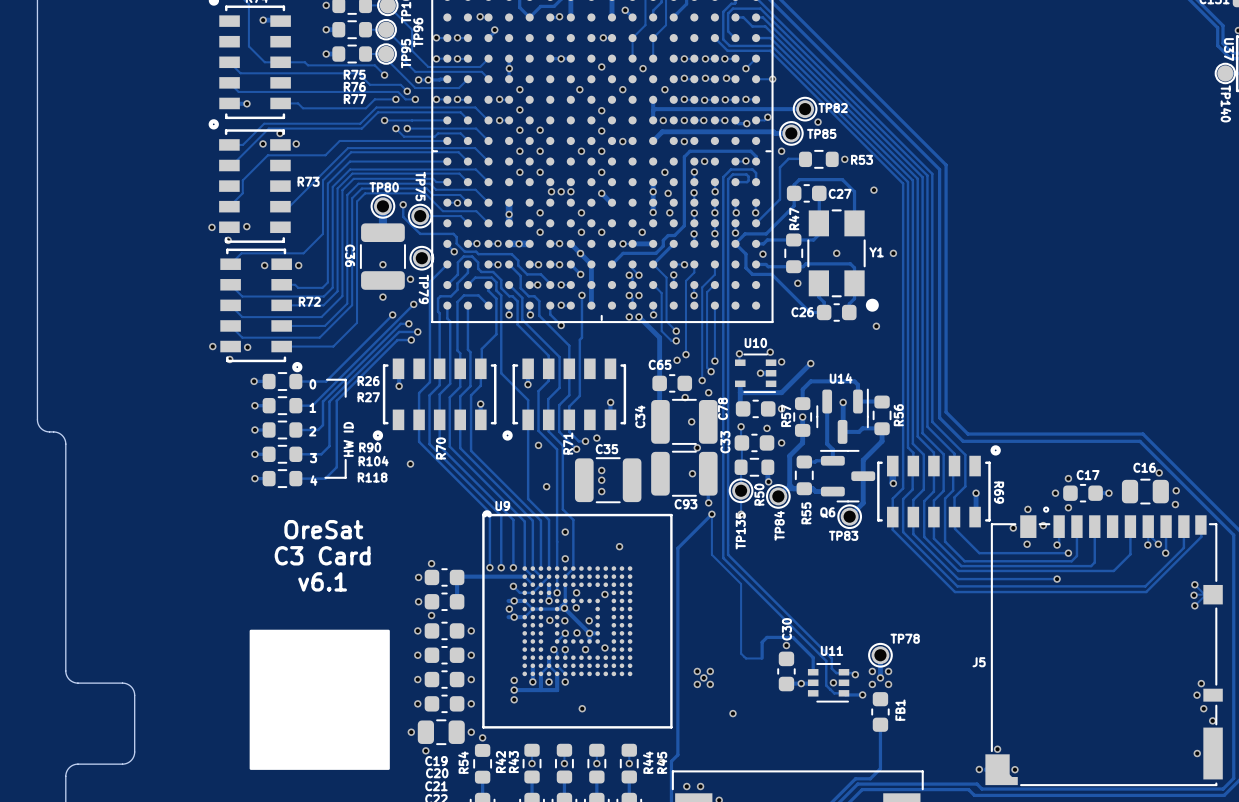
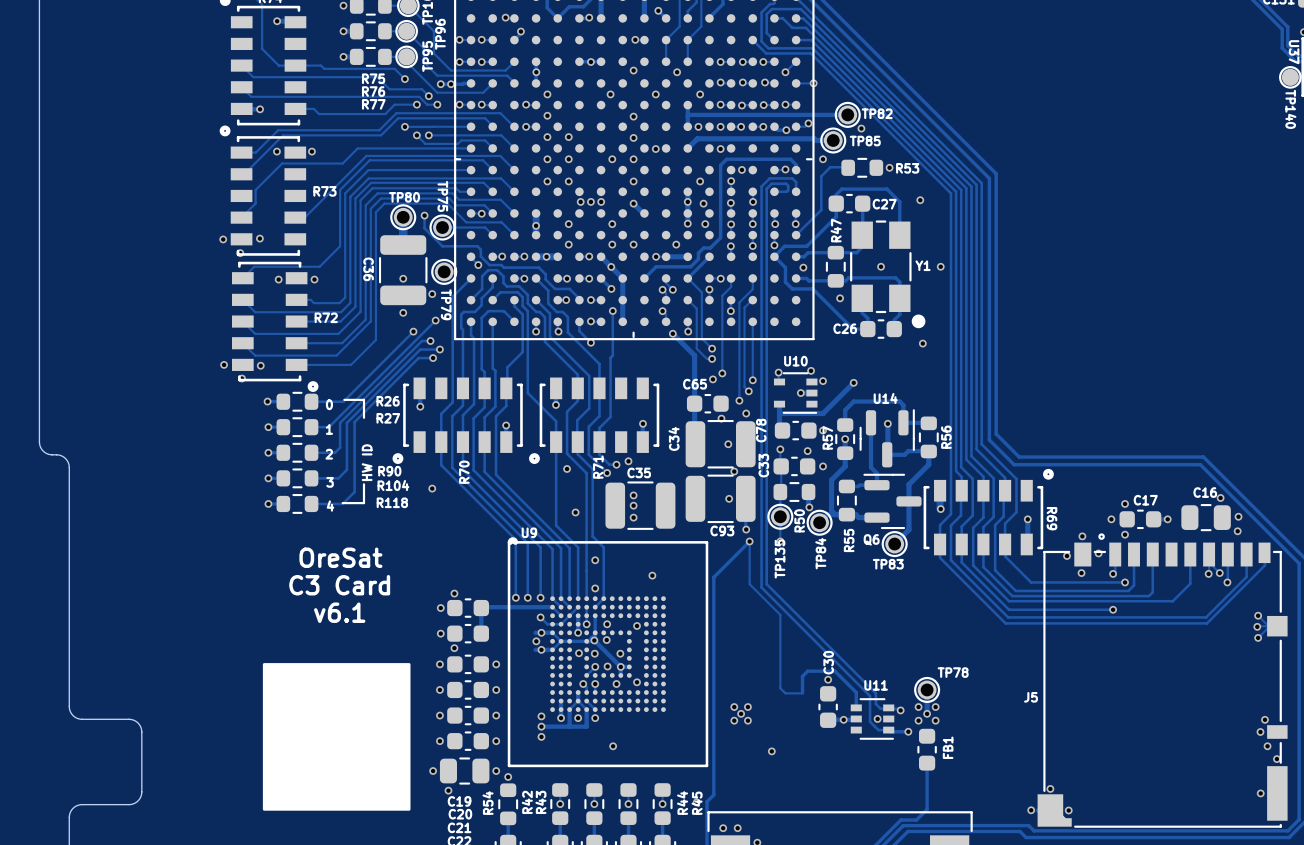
via: (280, 133) -> none
via: (638, 295) -> none
via: (629, 316) -> none

